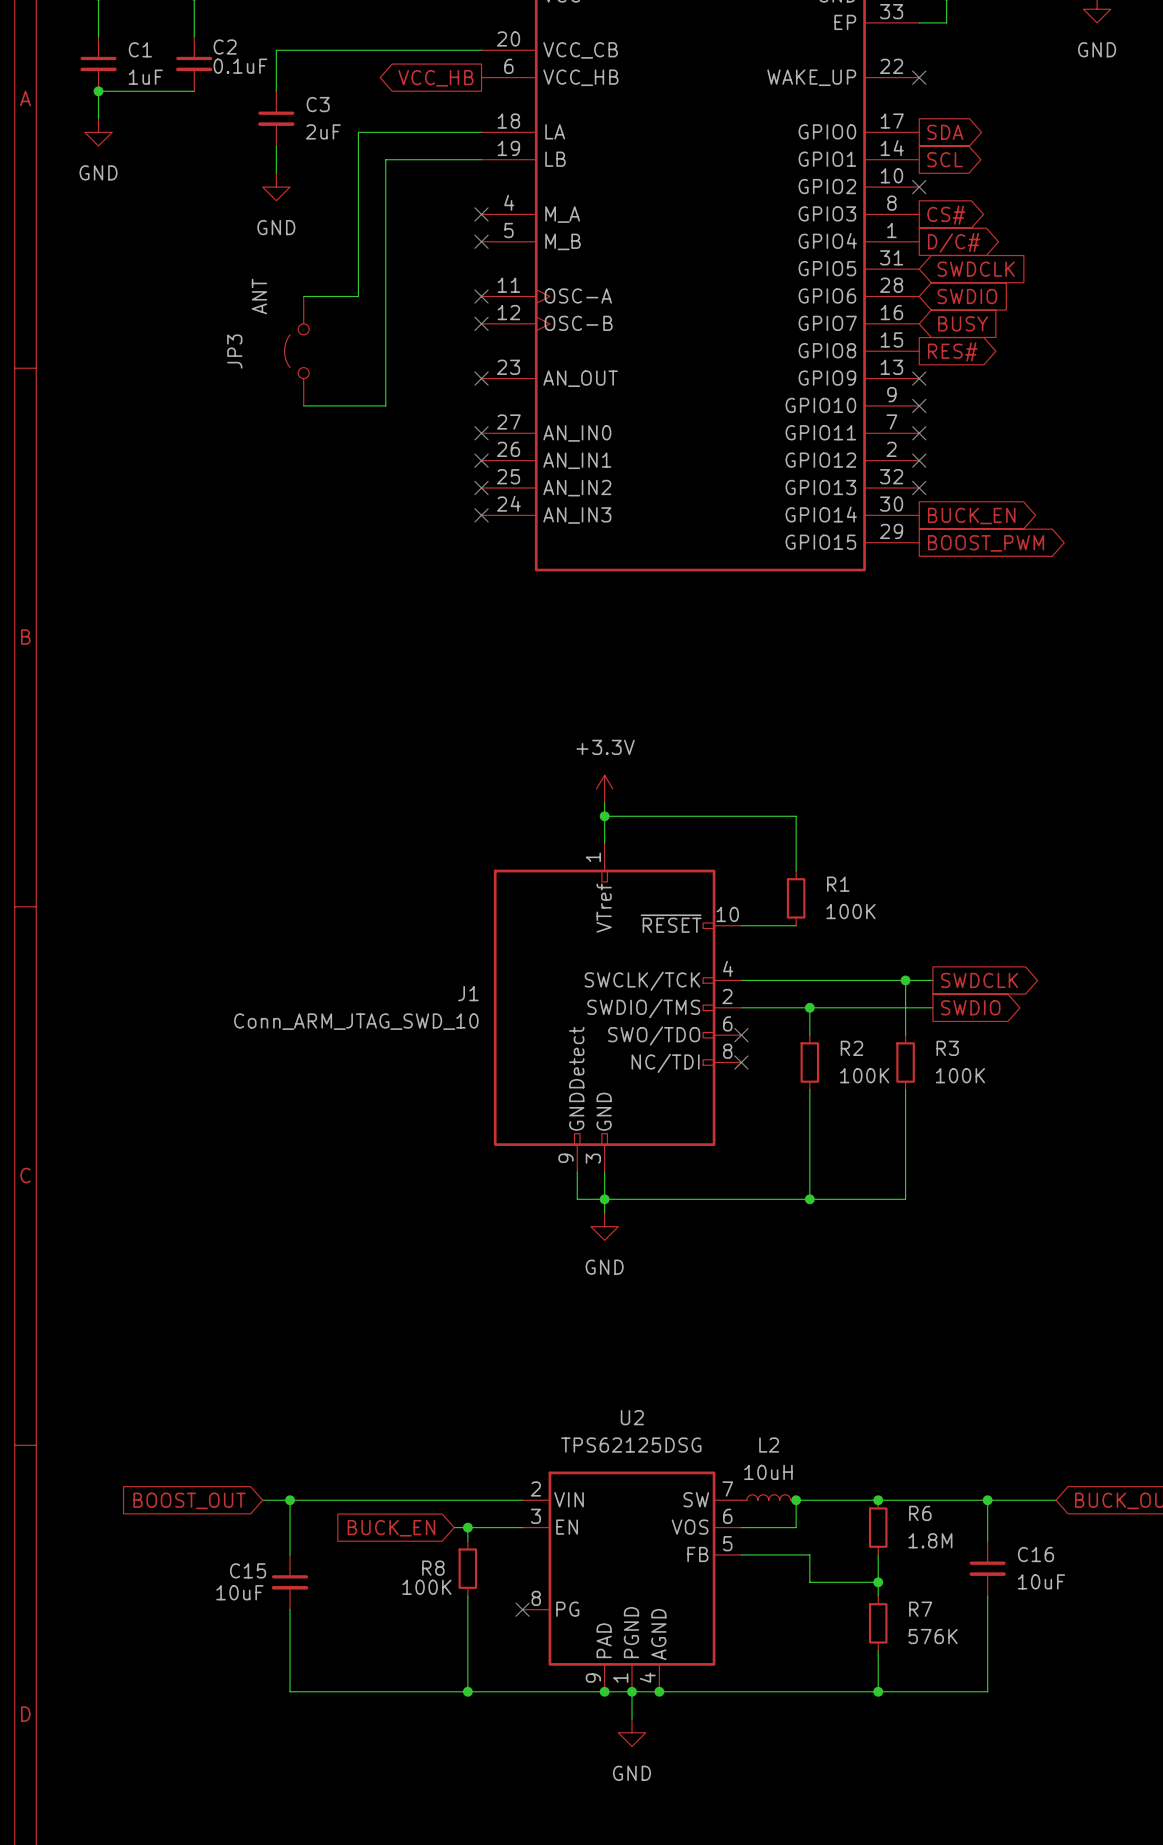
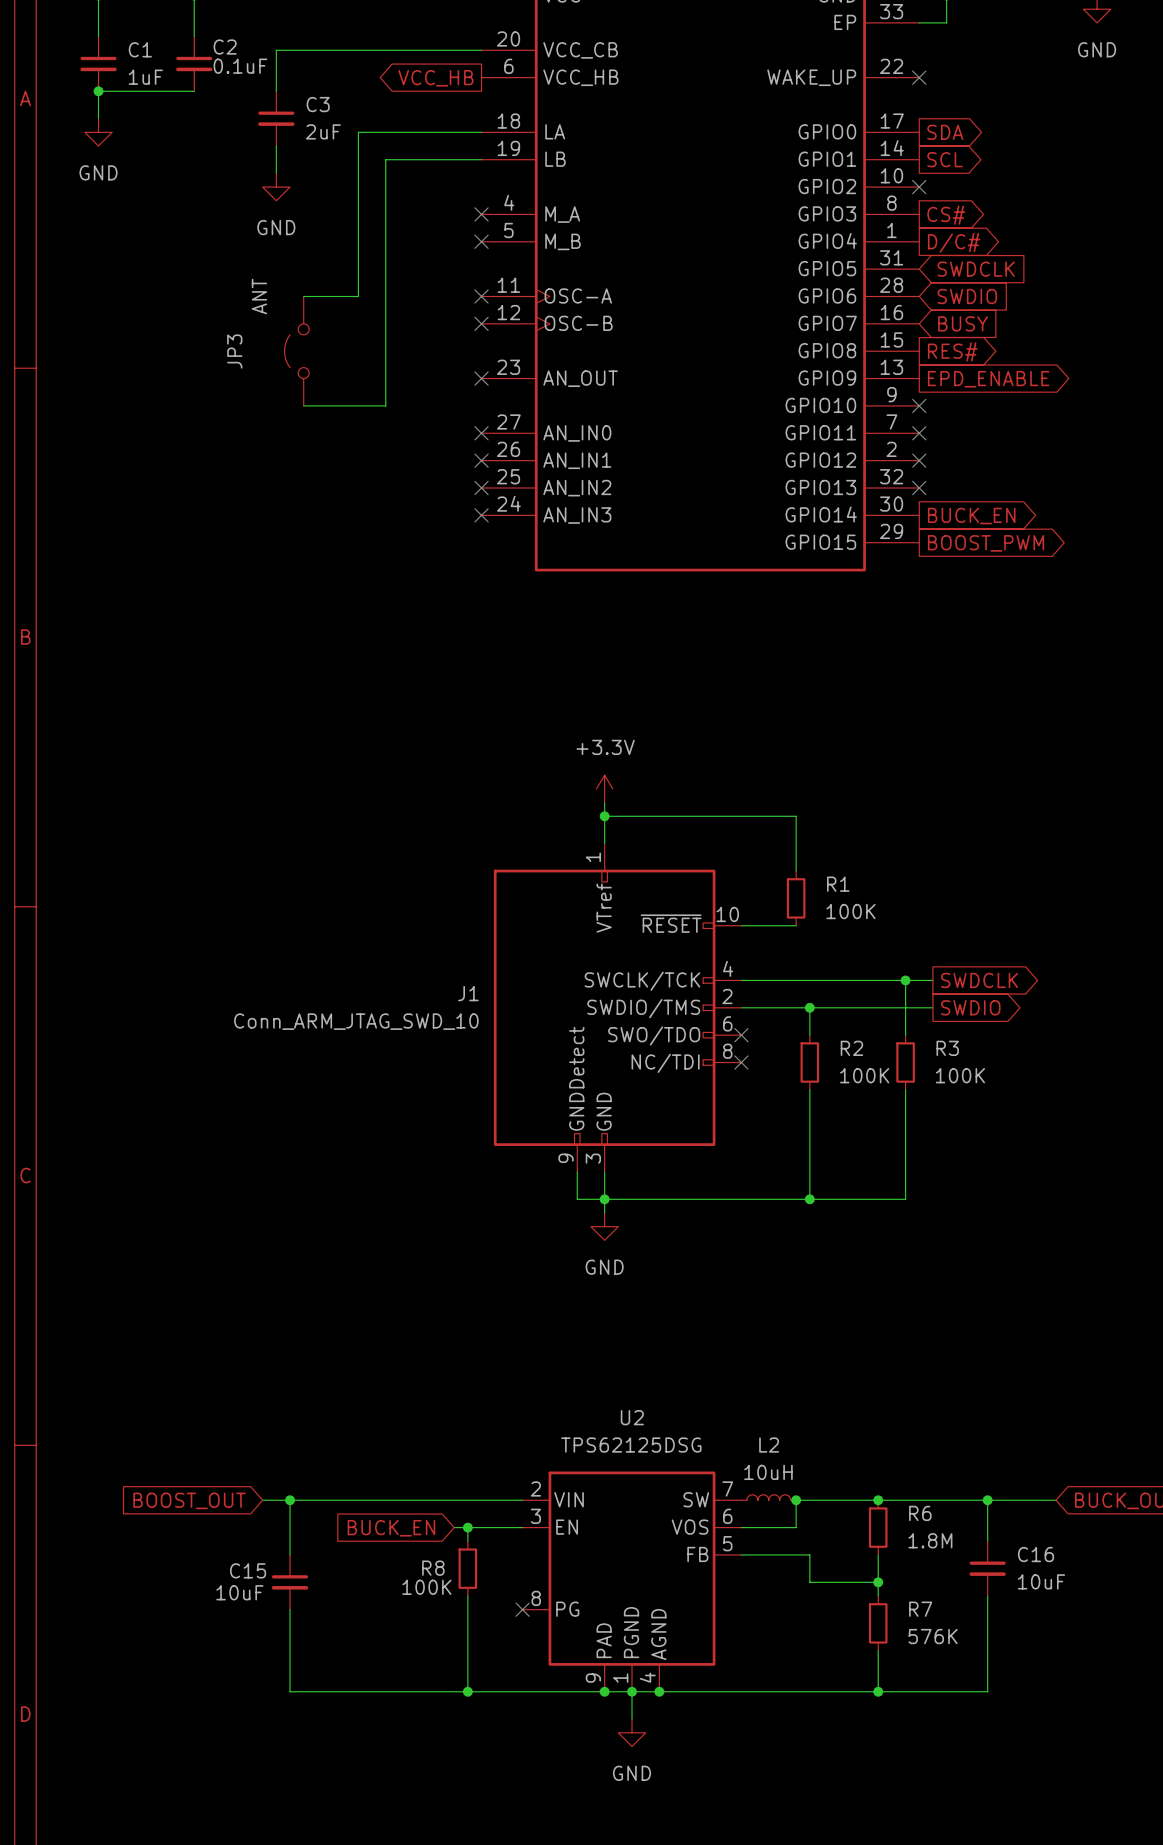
no-connect mark: (919, 378) -> none
global label: none -> EPD_ENABLE (988, 379)

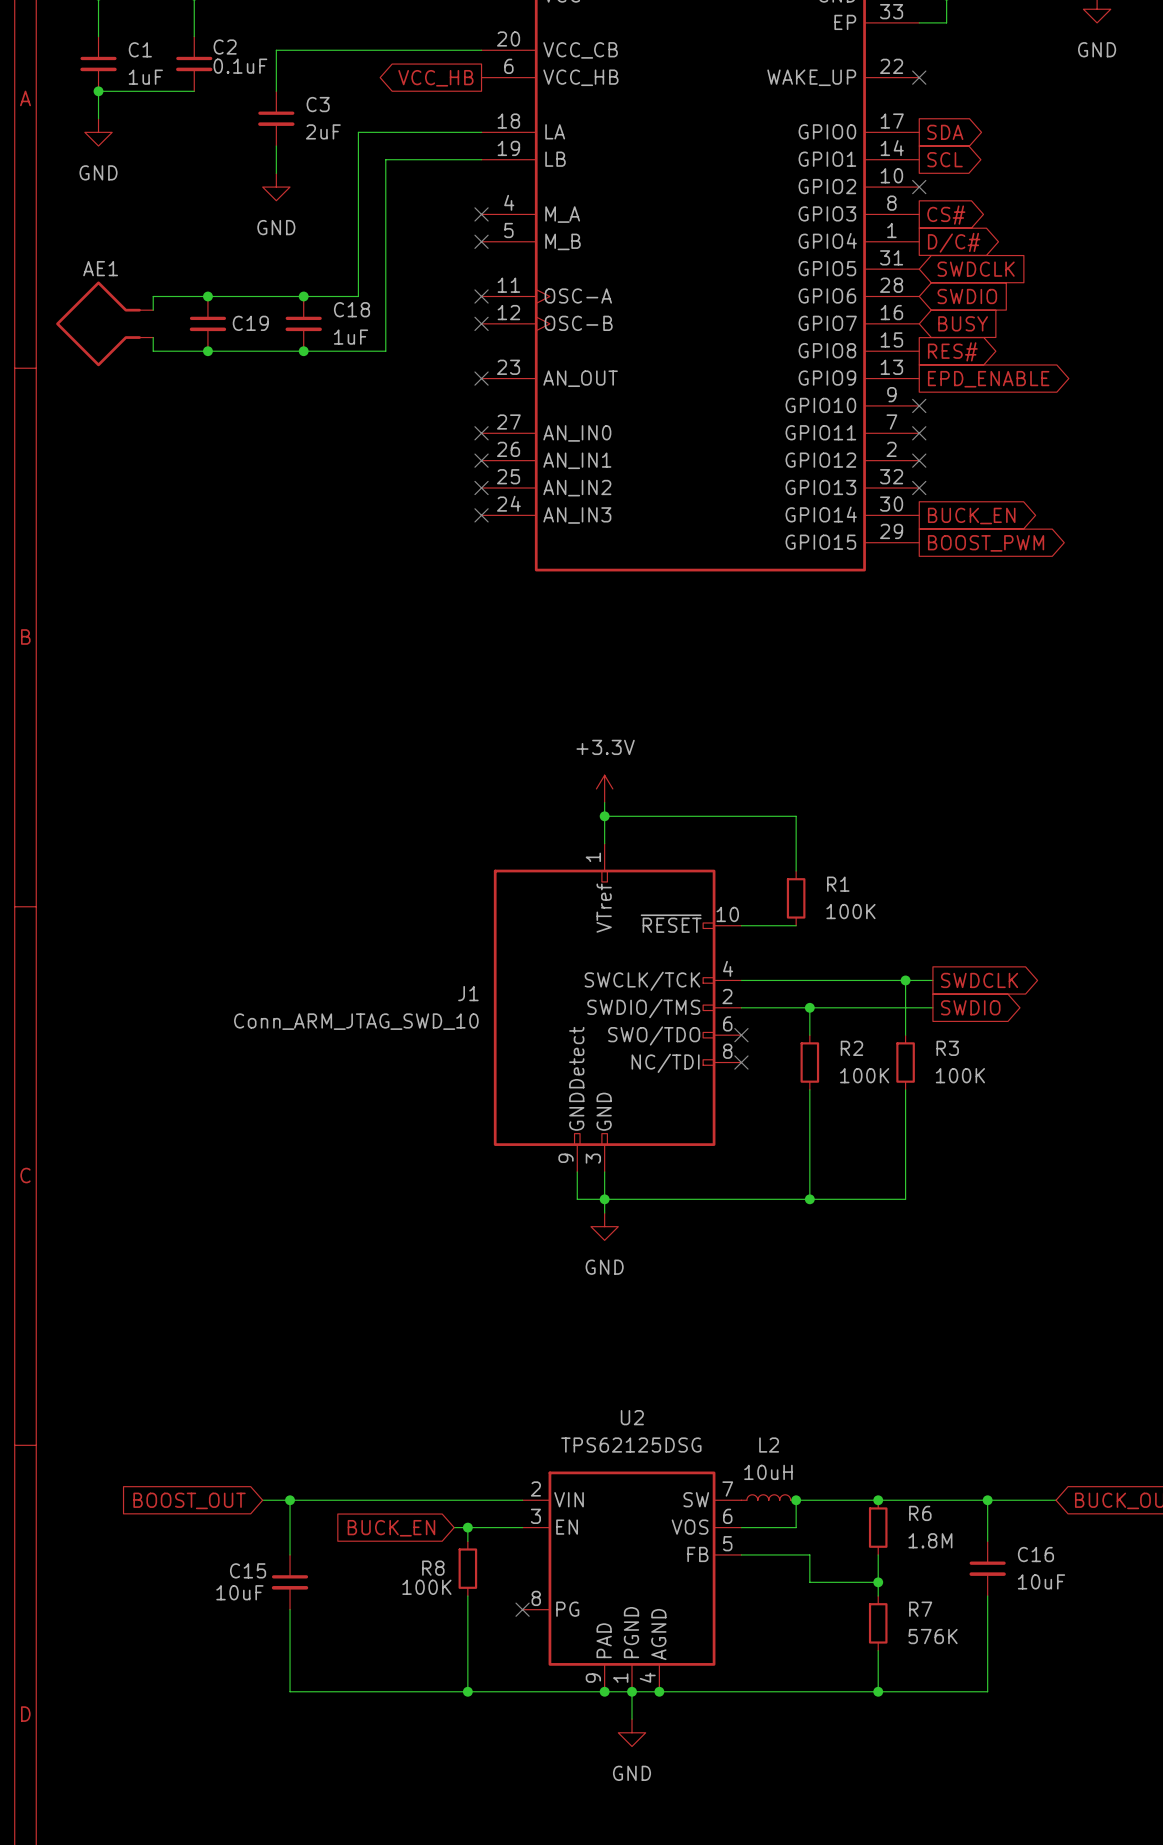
junction: none -> (207, 296)
wire: none -> (303, 296) (153, 296) (153, 310)
junction: none -> (303, 296)
AE1: none -> (104, 323)
C19: none -> (207, 323)
C18: none -> 1uF (303, 323)
junction: none -> (207, 351)
JP3: ANT (296, 351) -> none
junction: none -> (303, 351)
wire: (385, 351) (385, 405) (303, 405) -> (385, 351) (153, 351) (153, 337)

